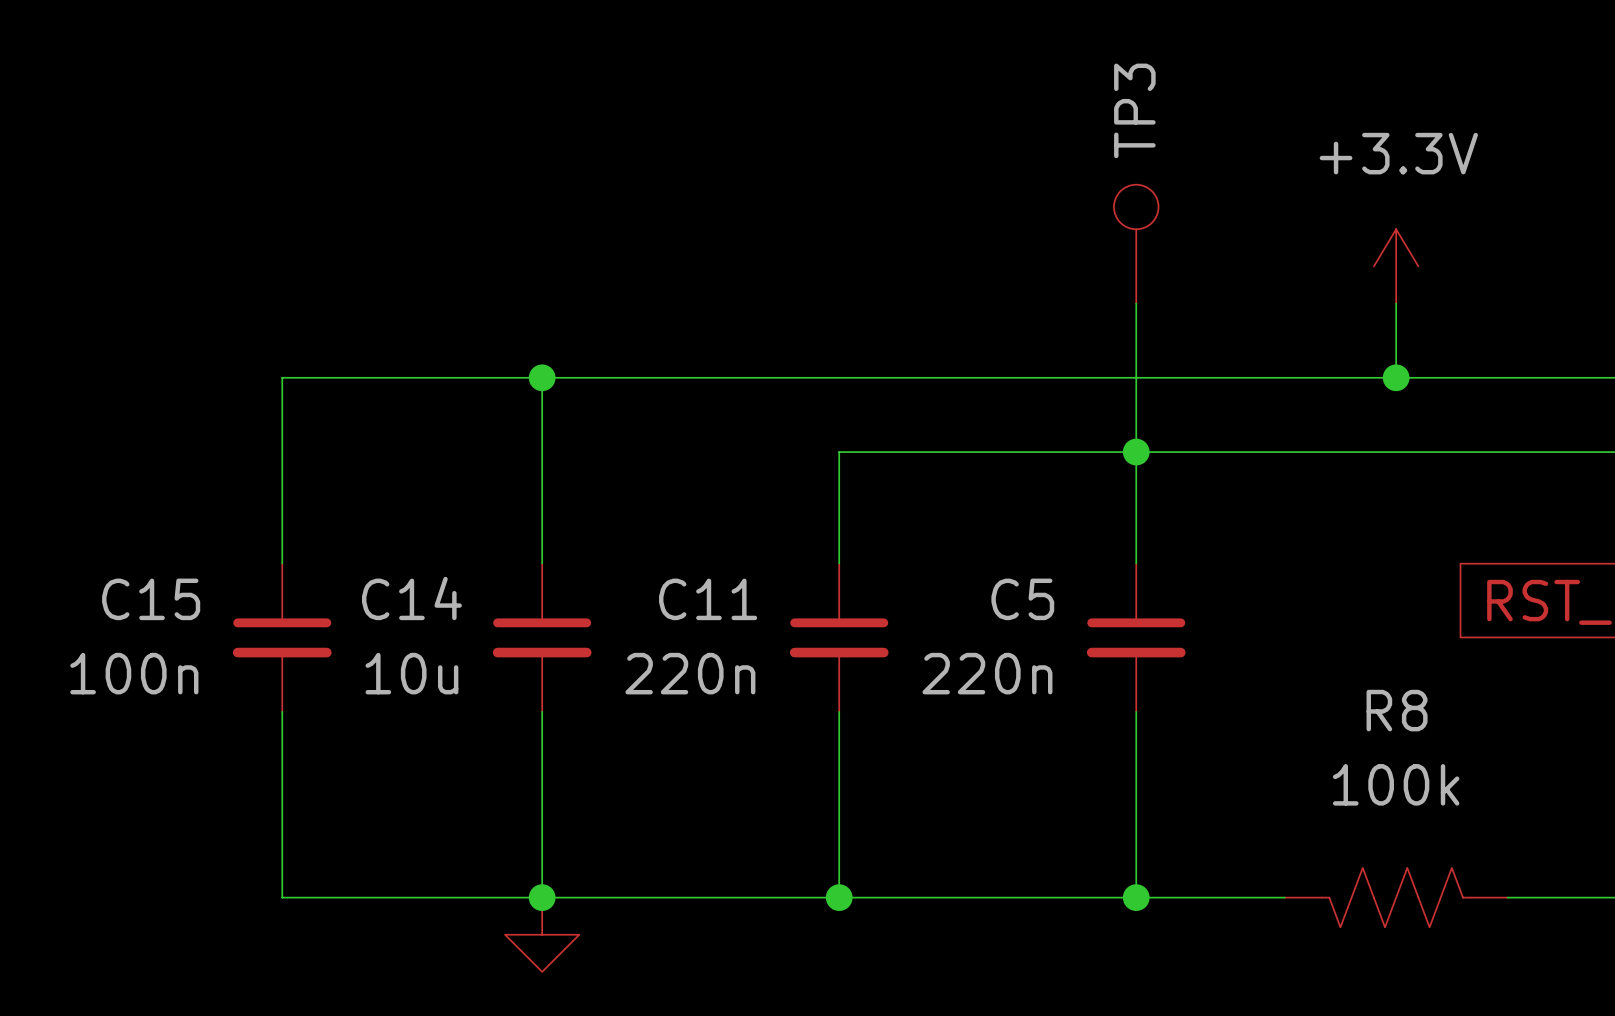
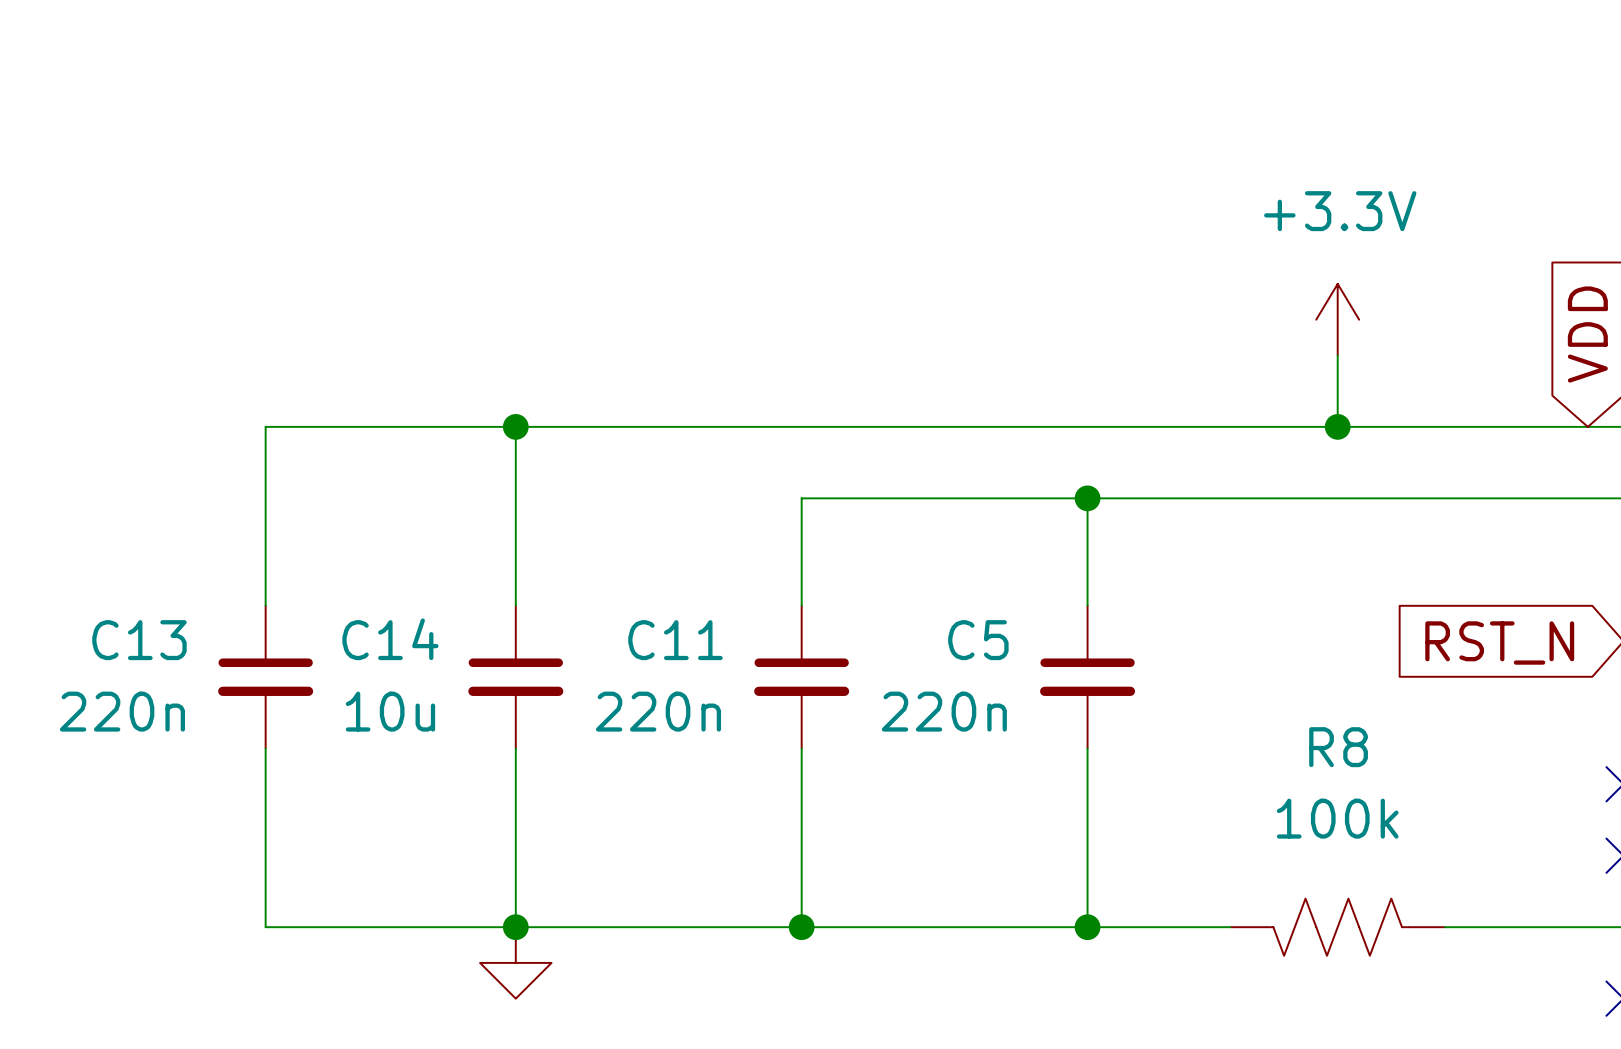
TP3: (1136, 244) -> none
wire: (1136, 303) (1136, 452) -> none
C15 name: C15 (151, 599) -> C13 (139, 640)
C15 value: 100n (134, 673) -> 220n (122, 711)

